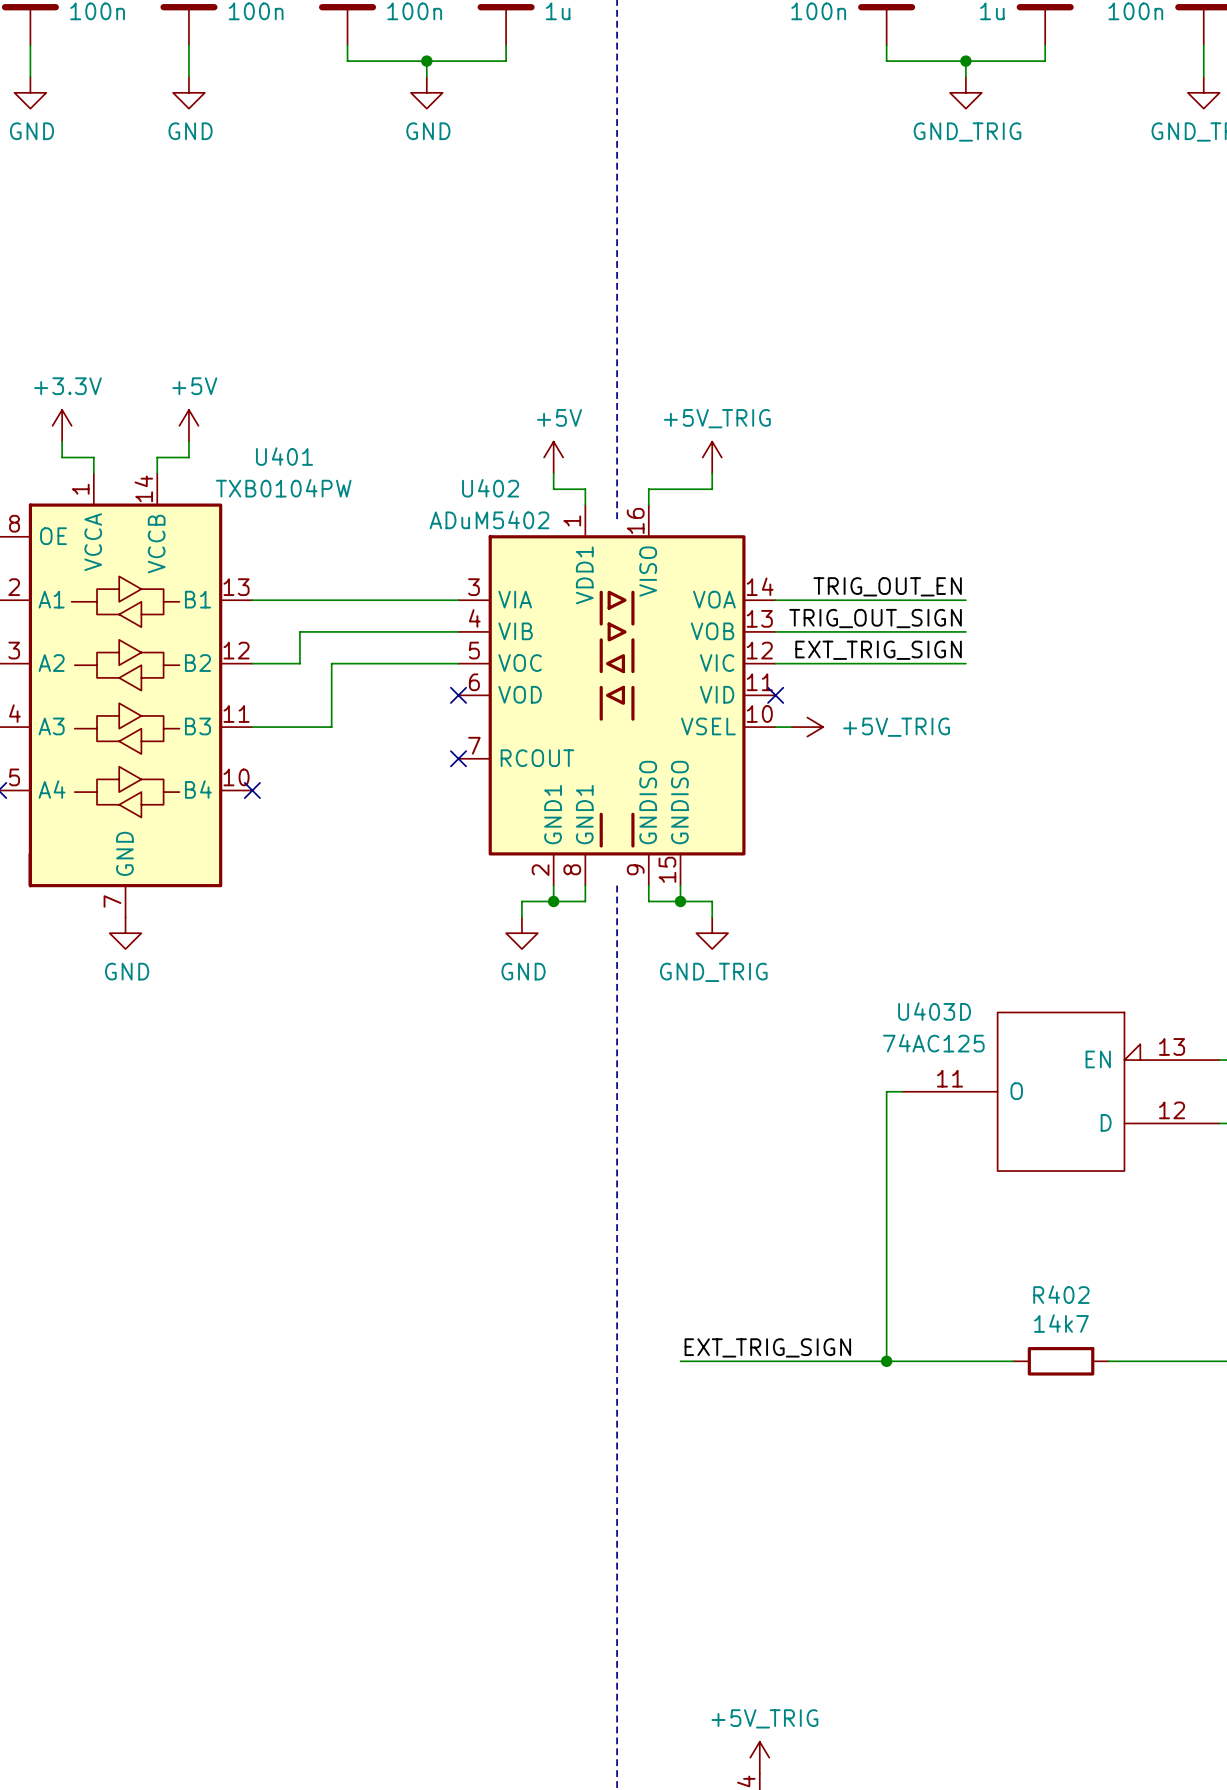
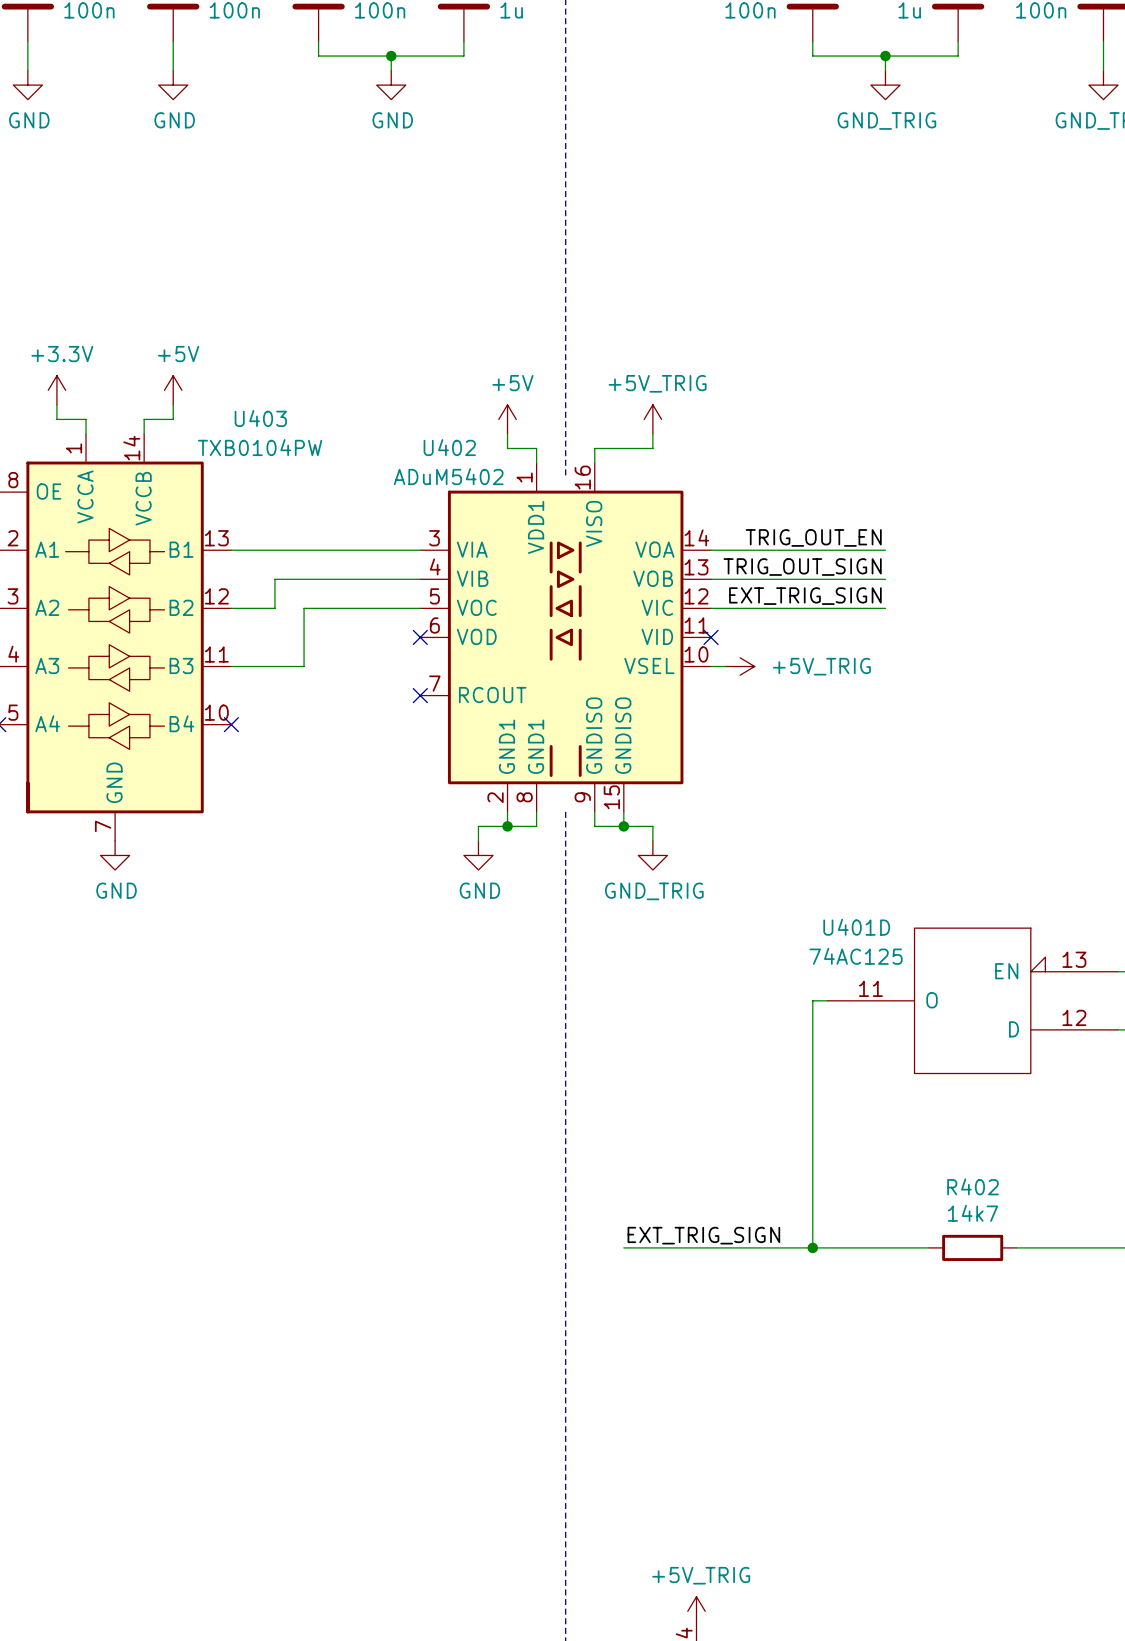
U401 name: U401 (284, 456) -> U403 (260, 418)
U403D name: U403D (934, 1011) -> U401D (856, 927)

